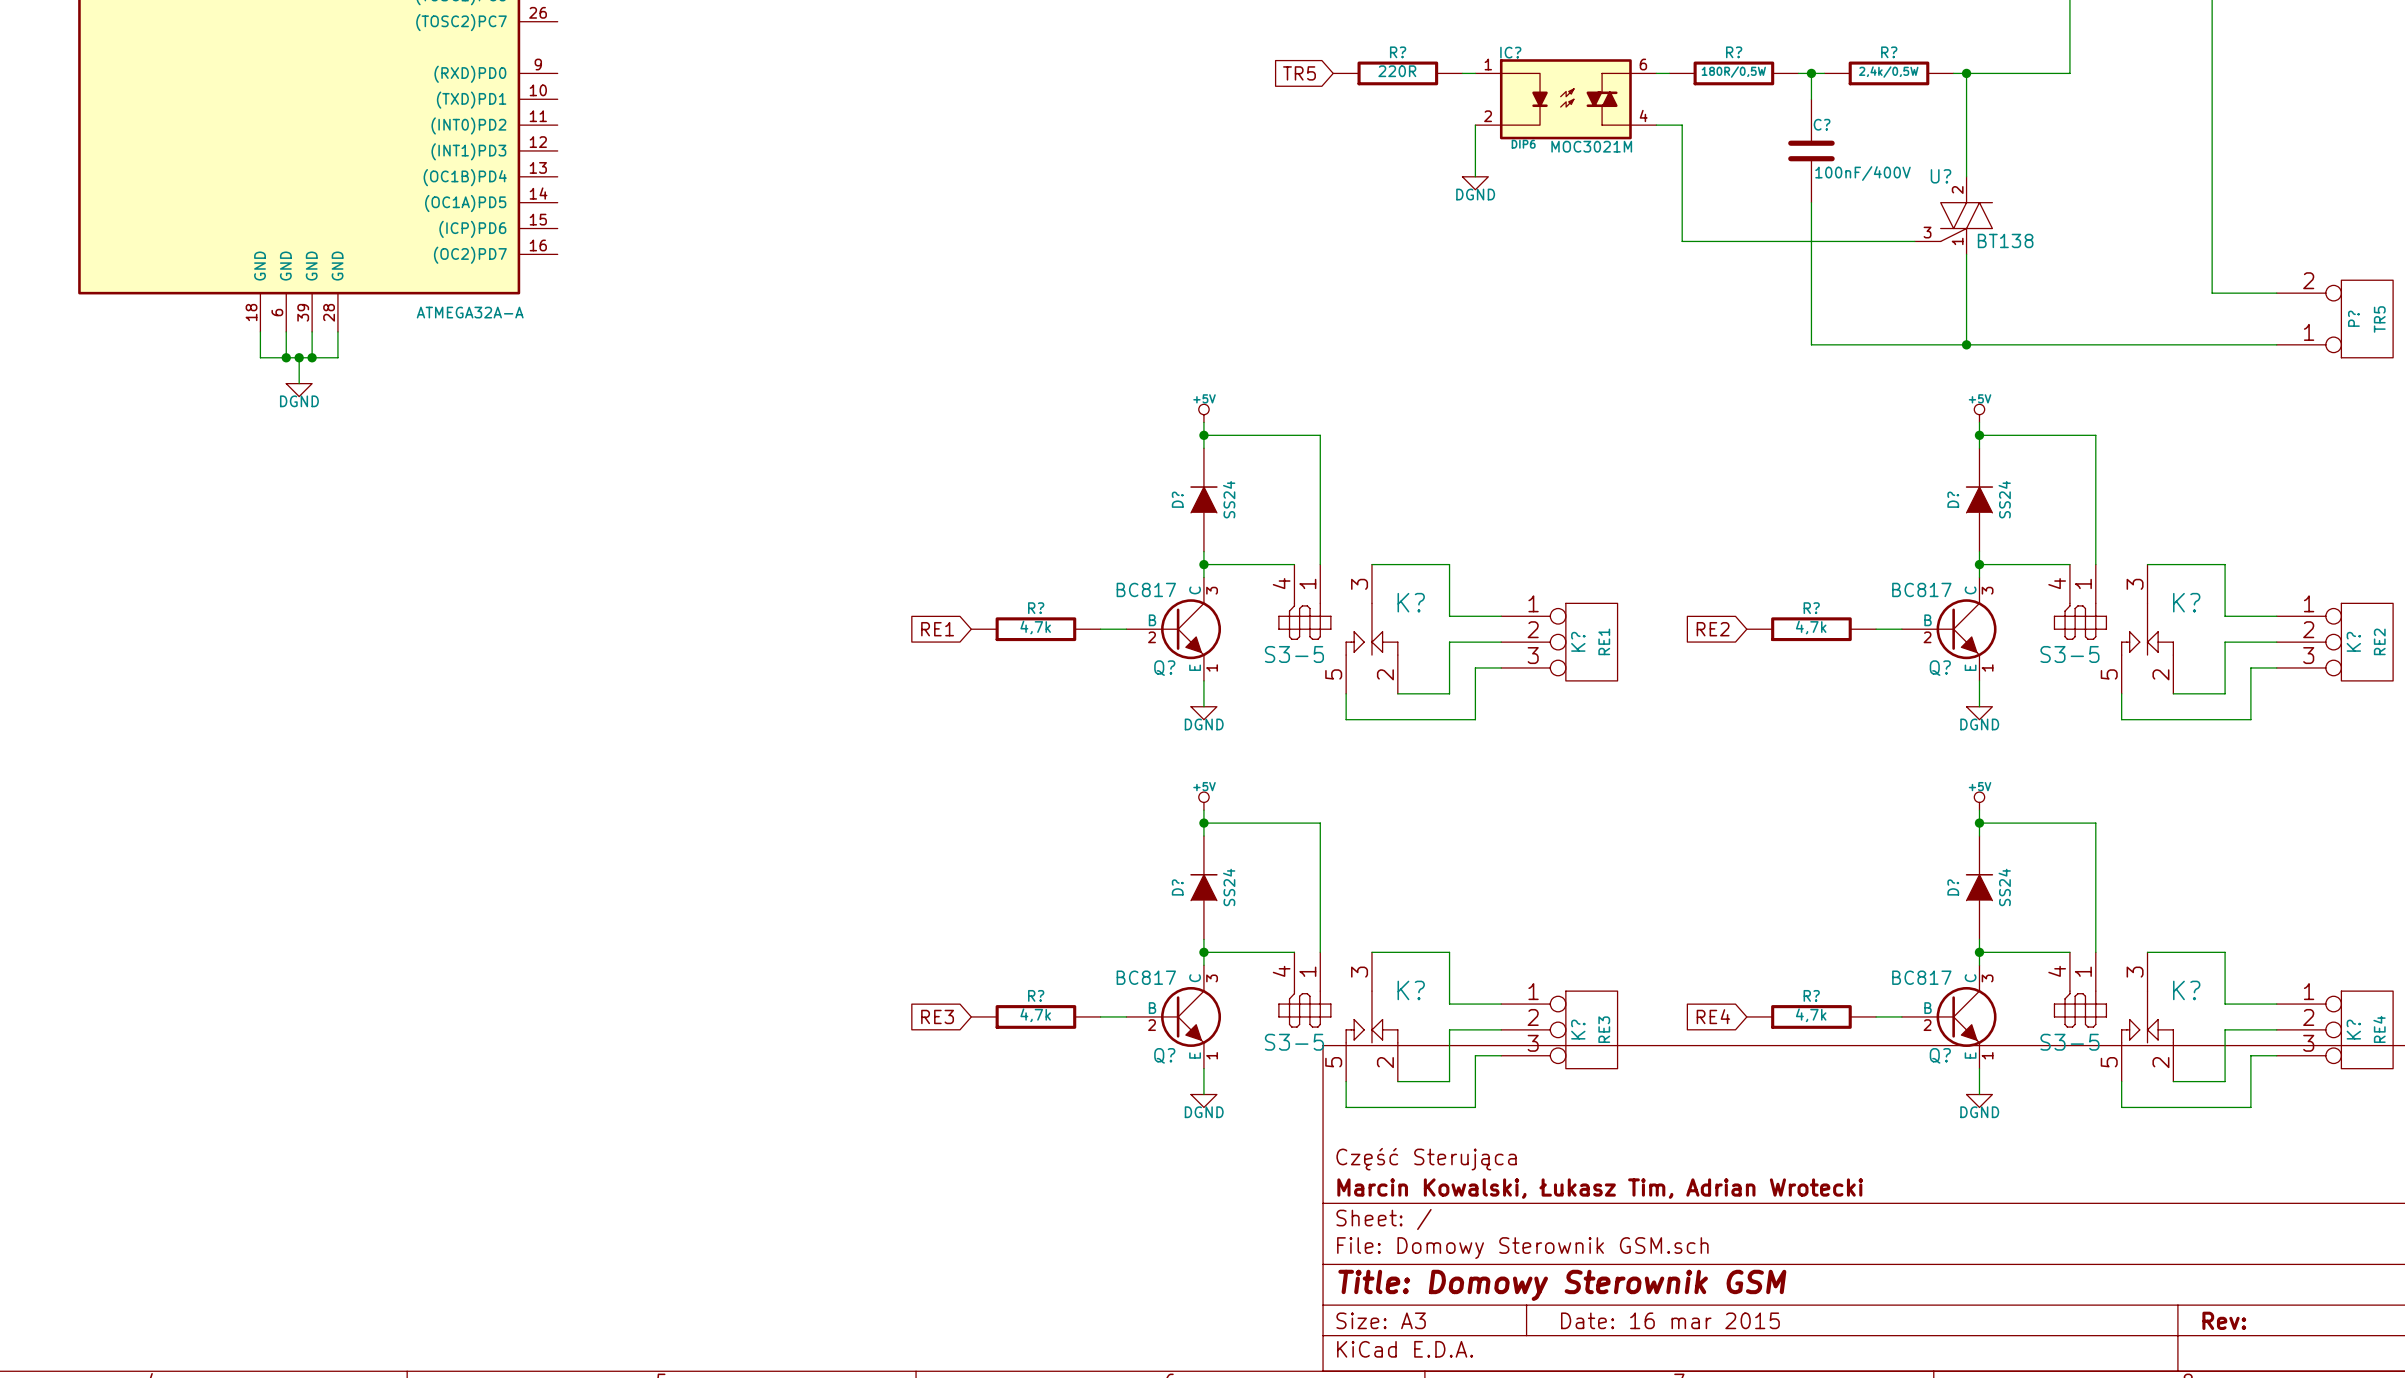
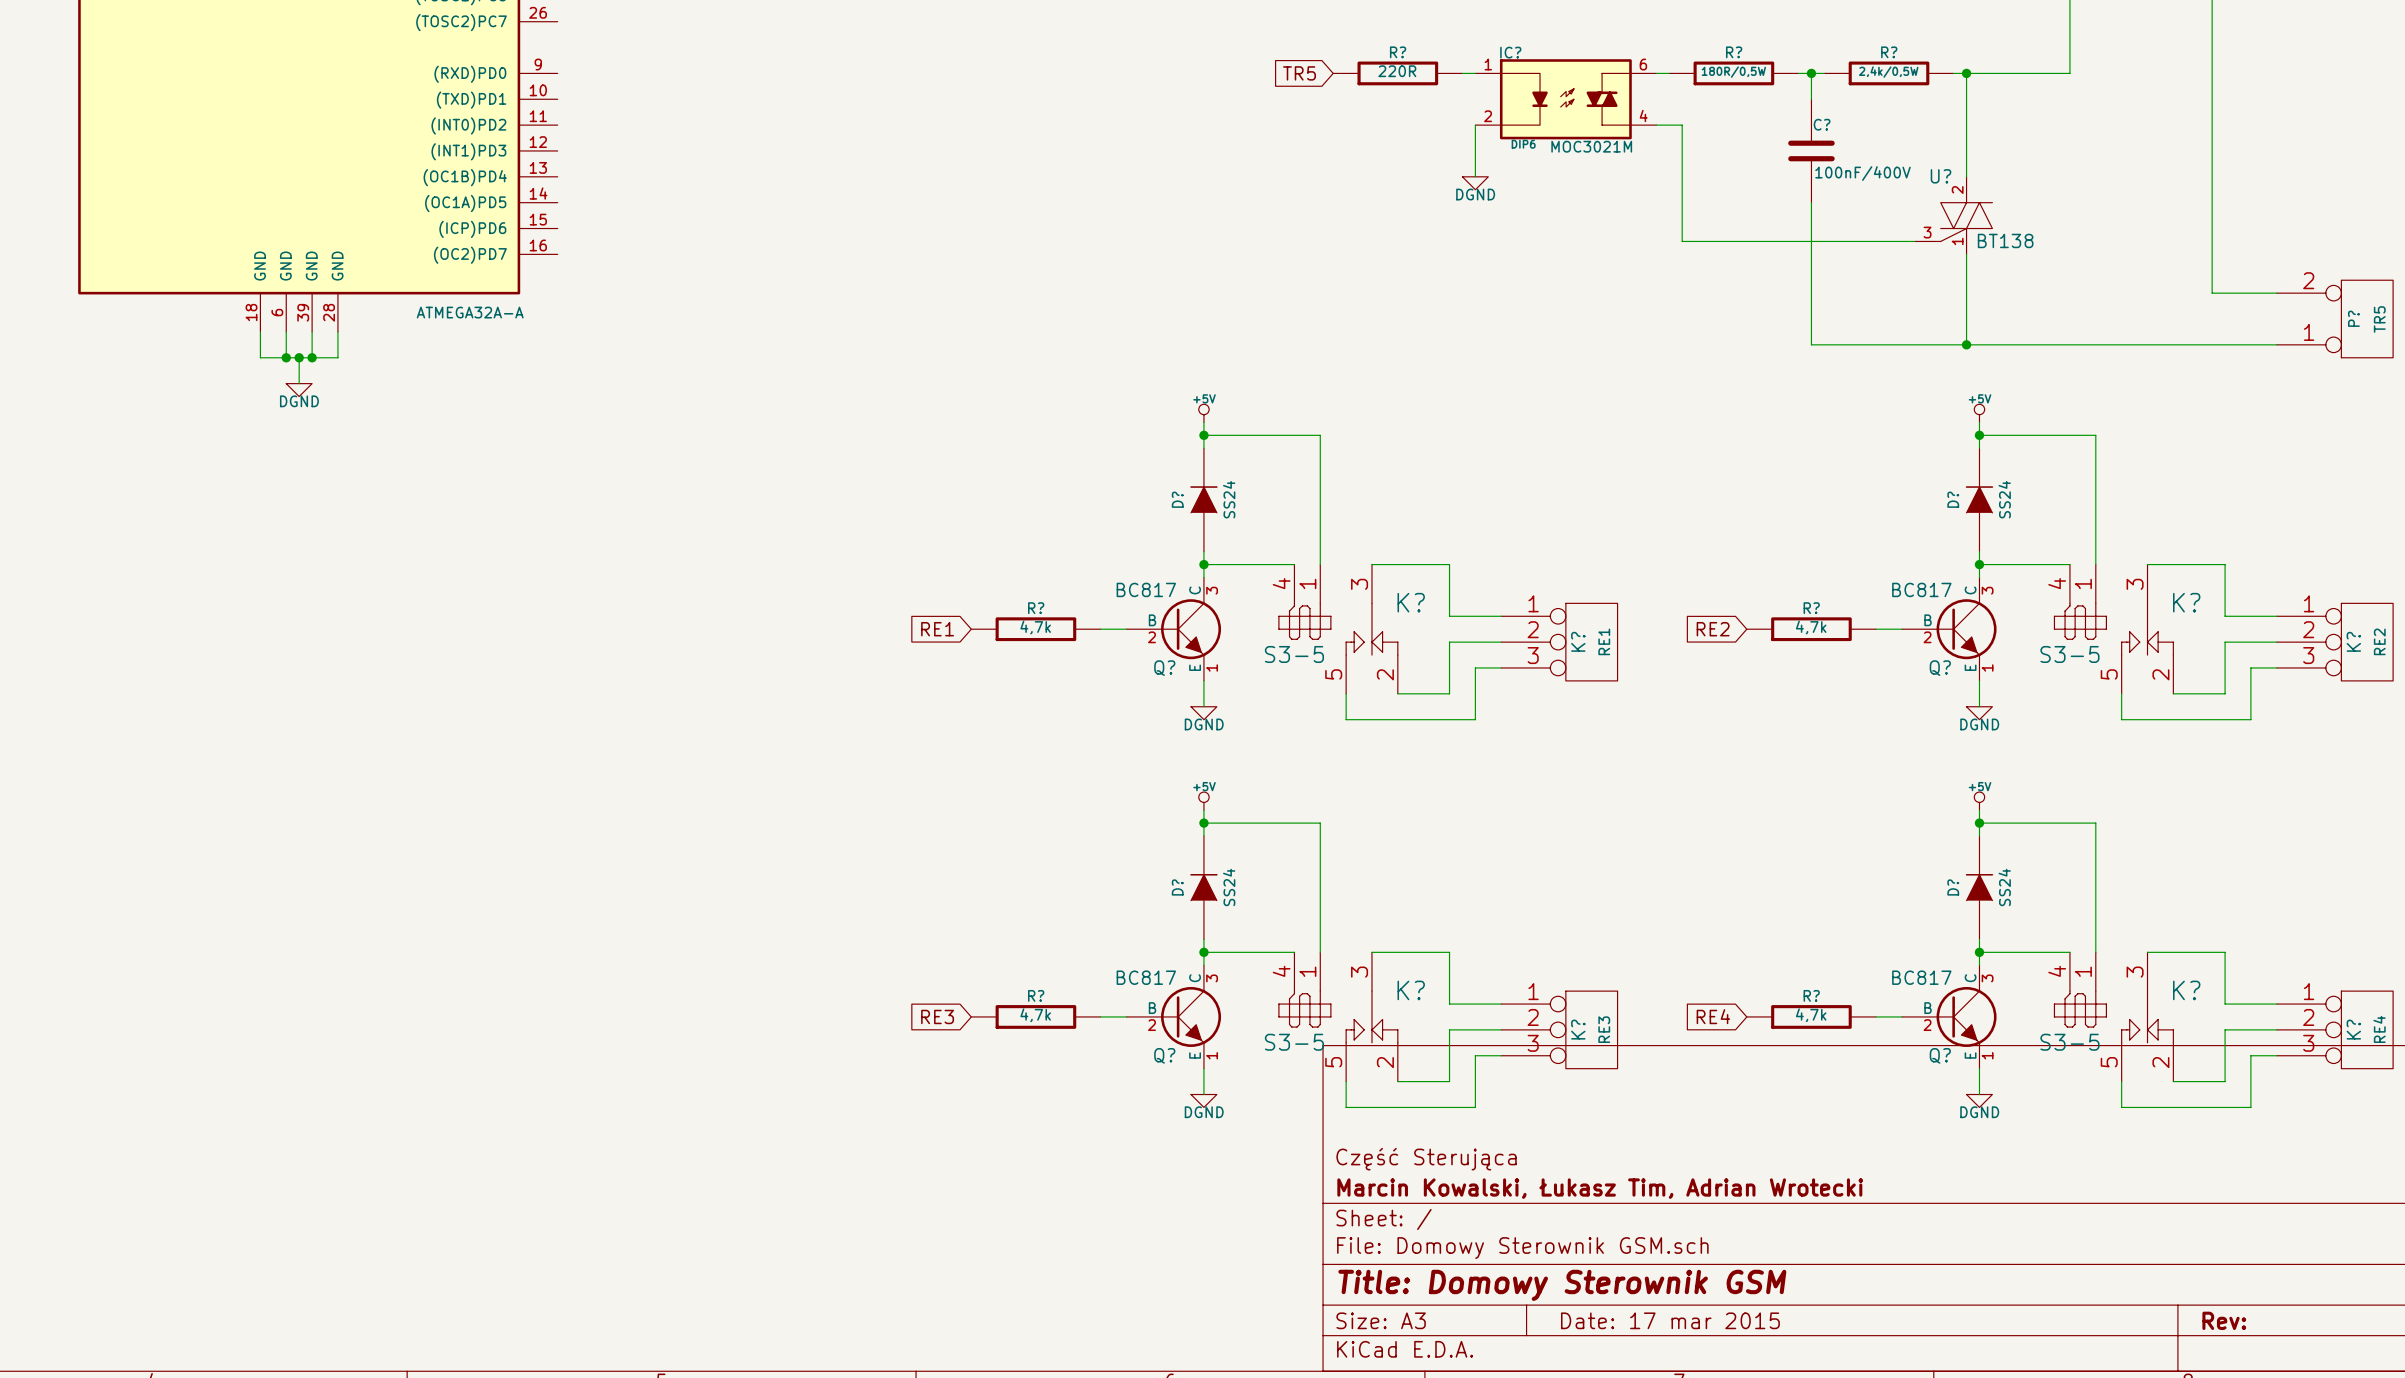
title block: Date: 16 mar 2015 (1670, 1320) -> Date: 17 mar 2015 (1670, 1320)

